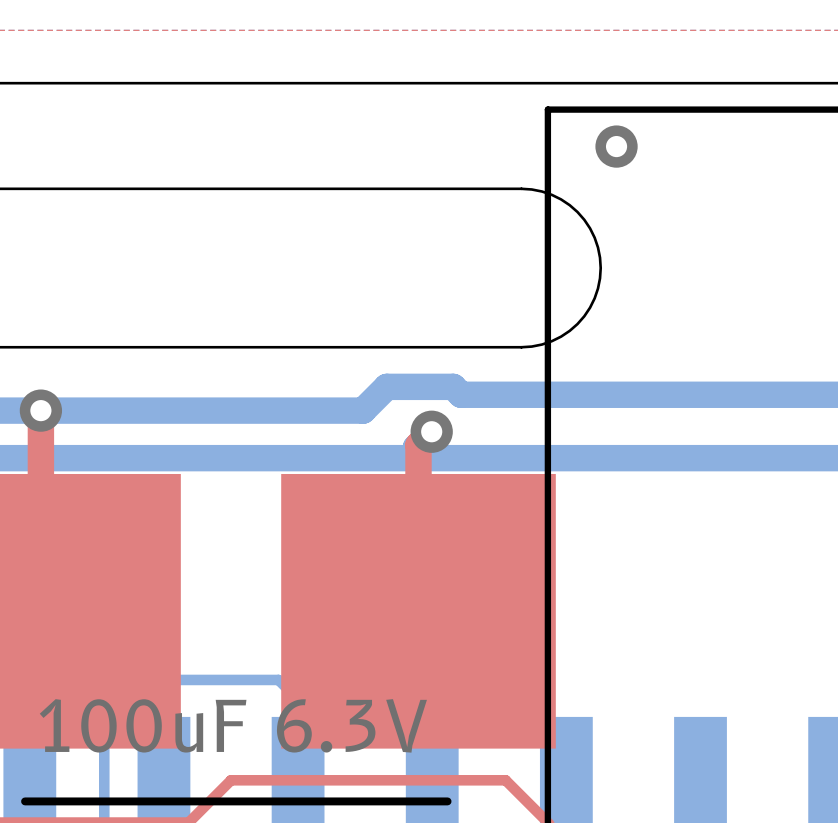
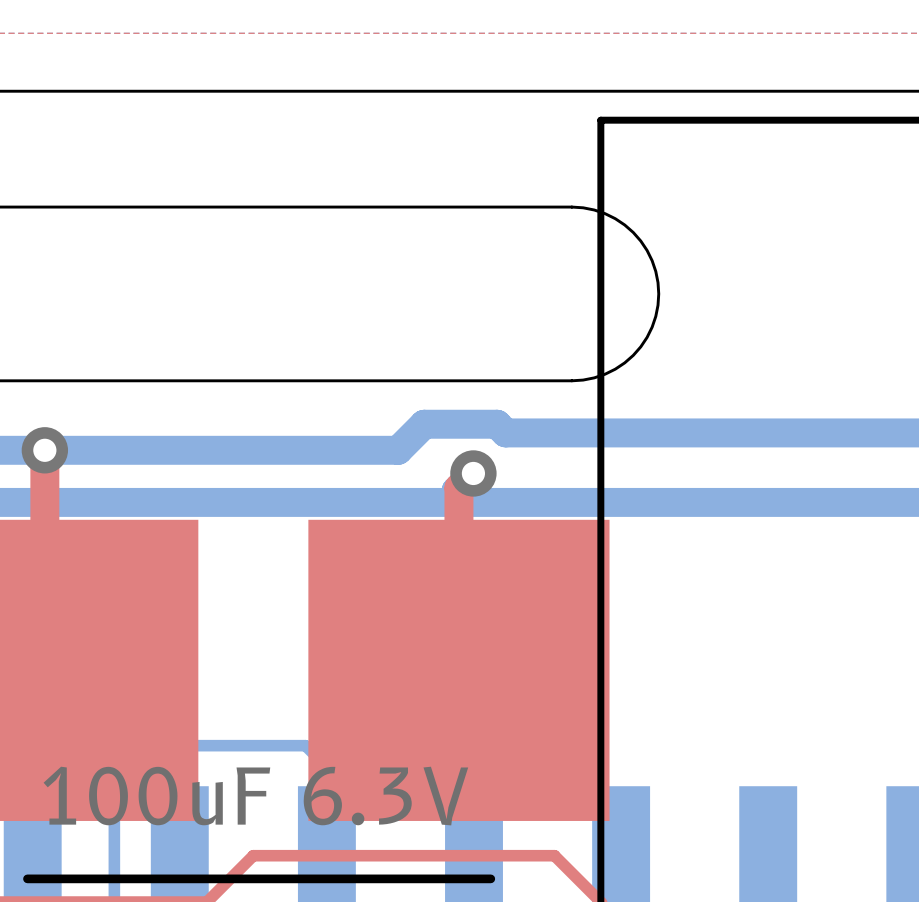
via: (616, 146) -> none

